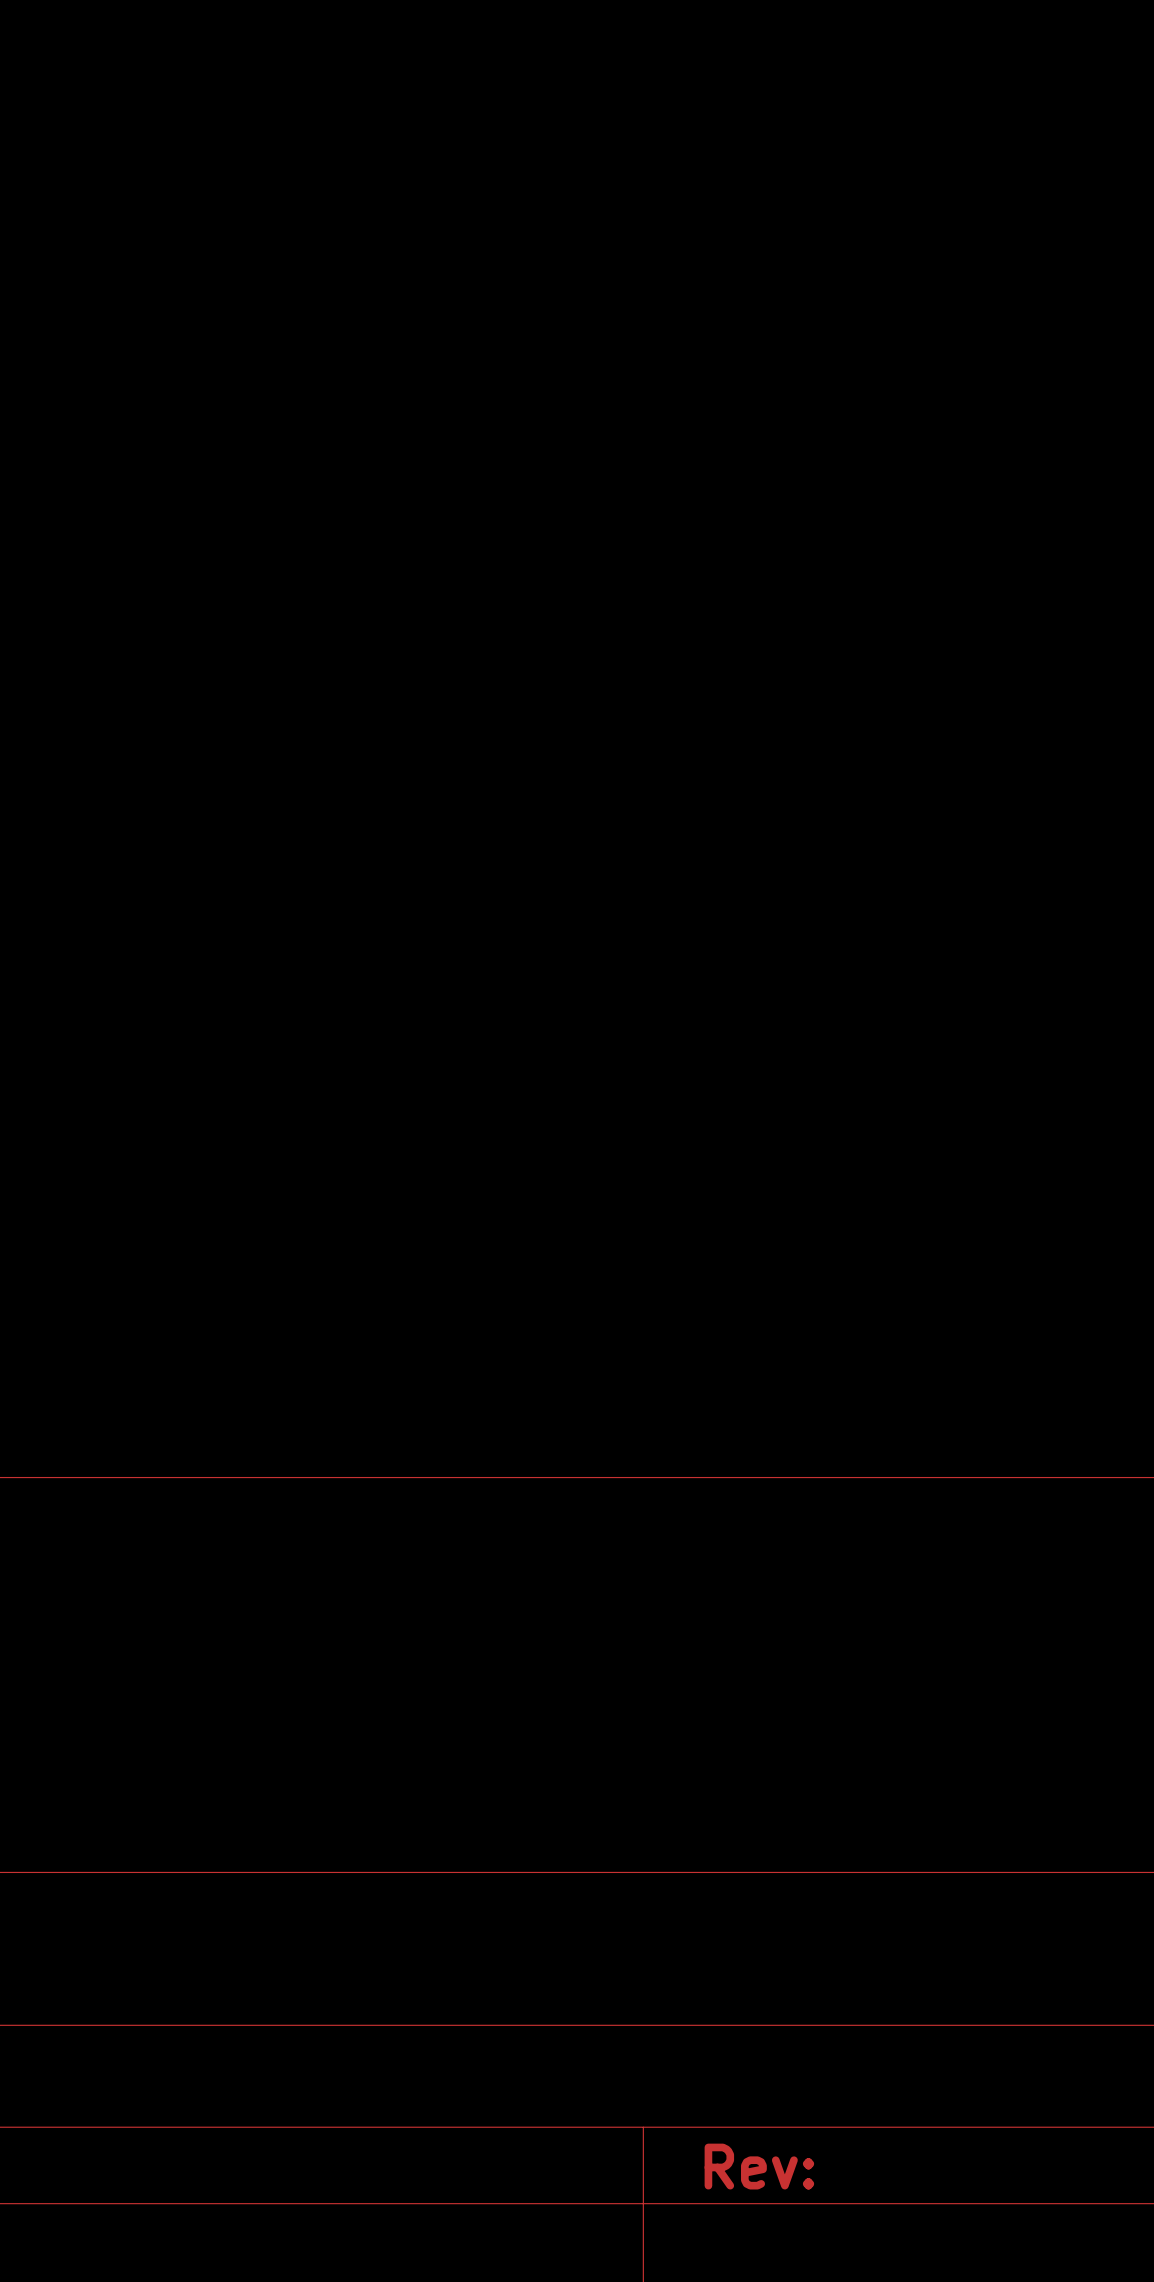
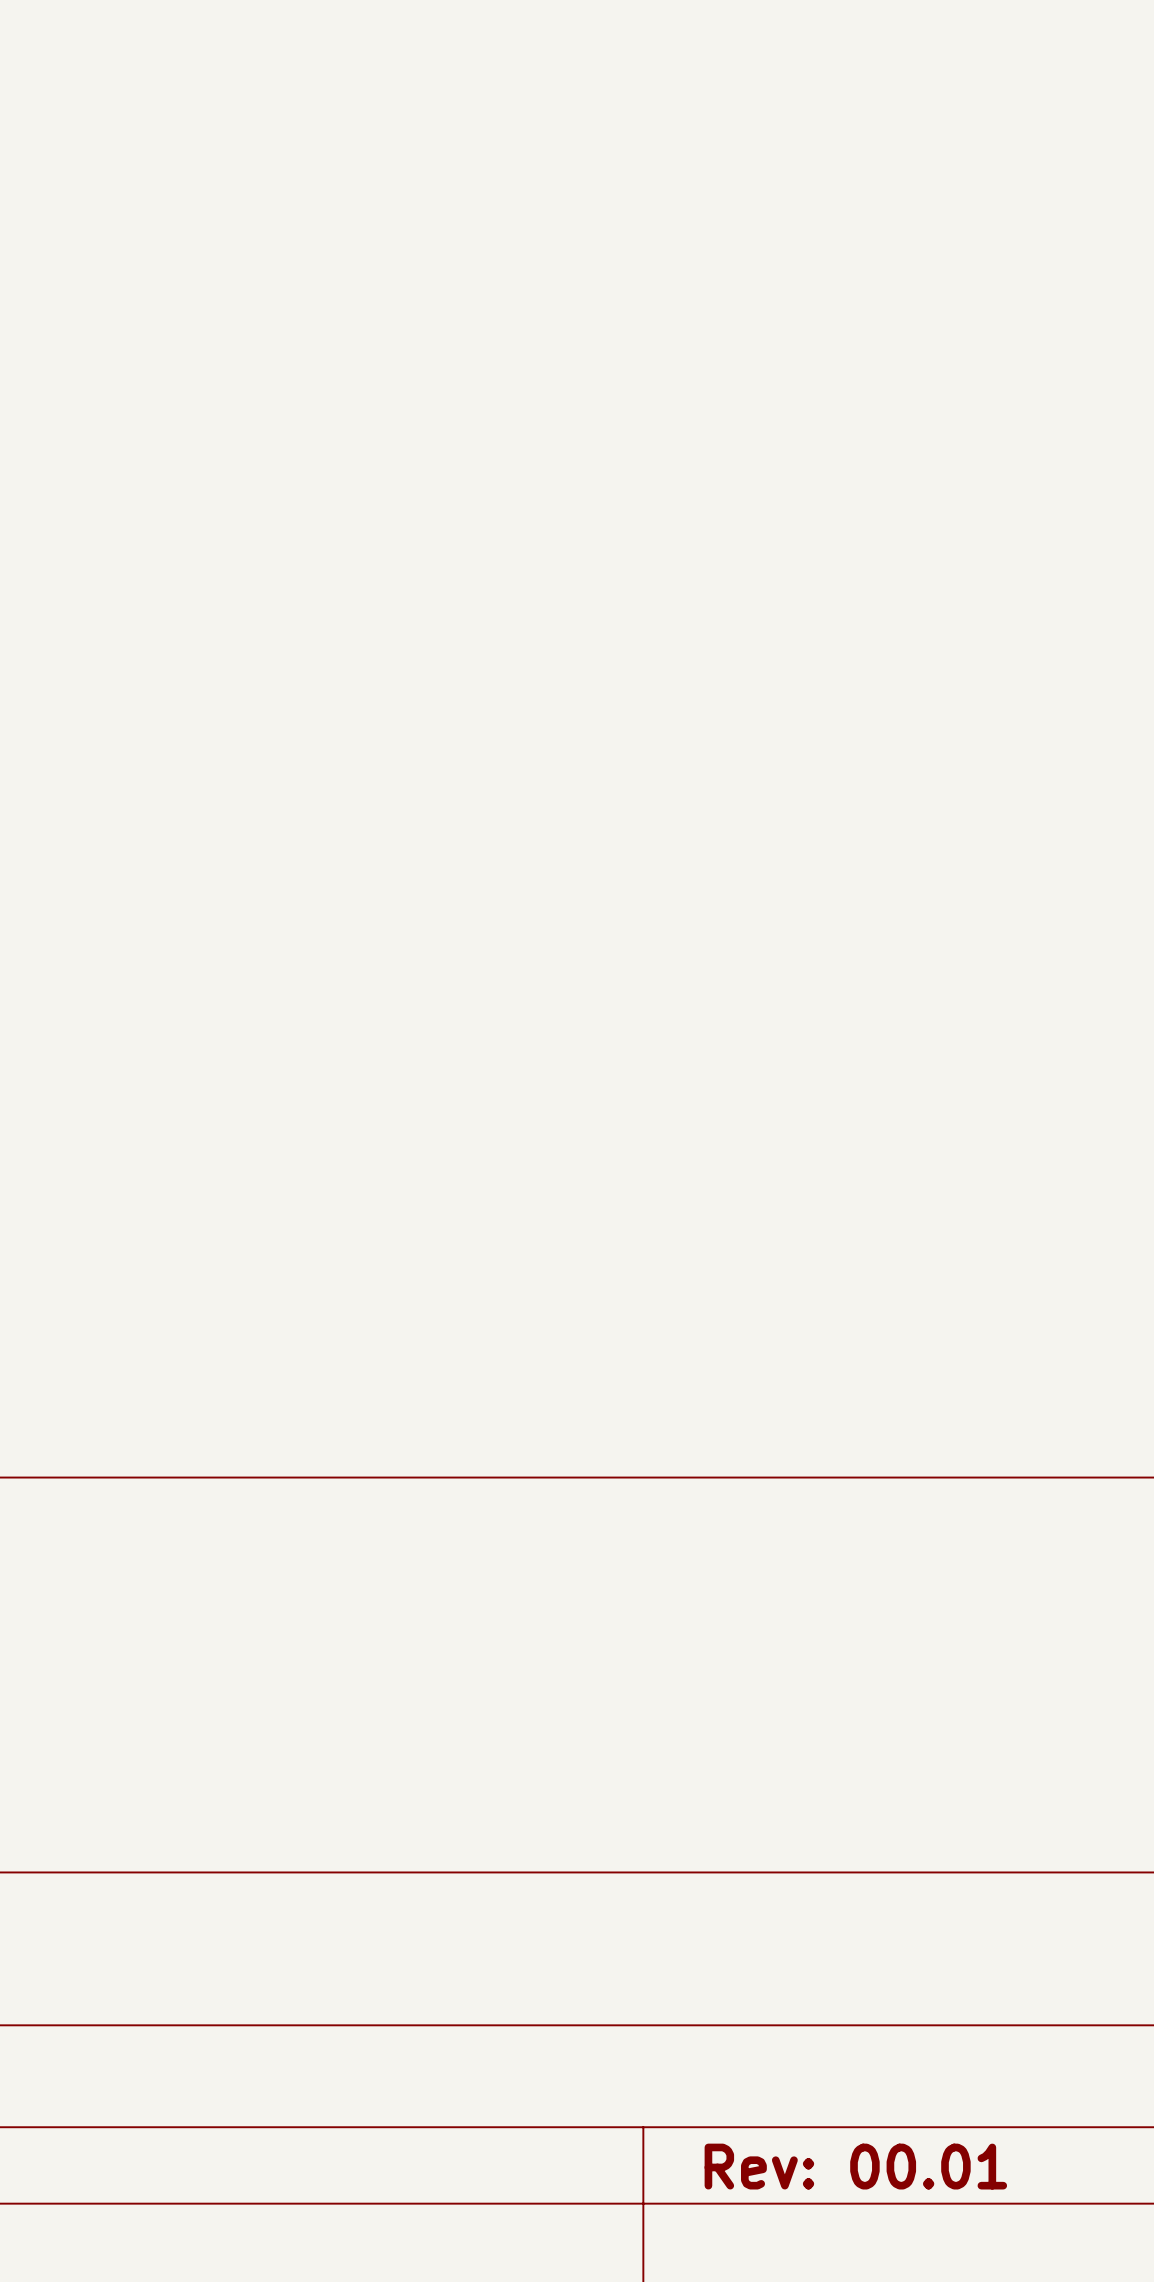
title block: Rev: (759, 2166) -> Rev: 00.01 (855, 2166)

